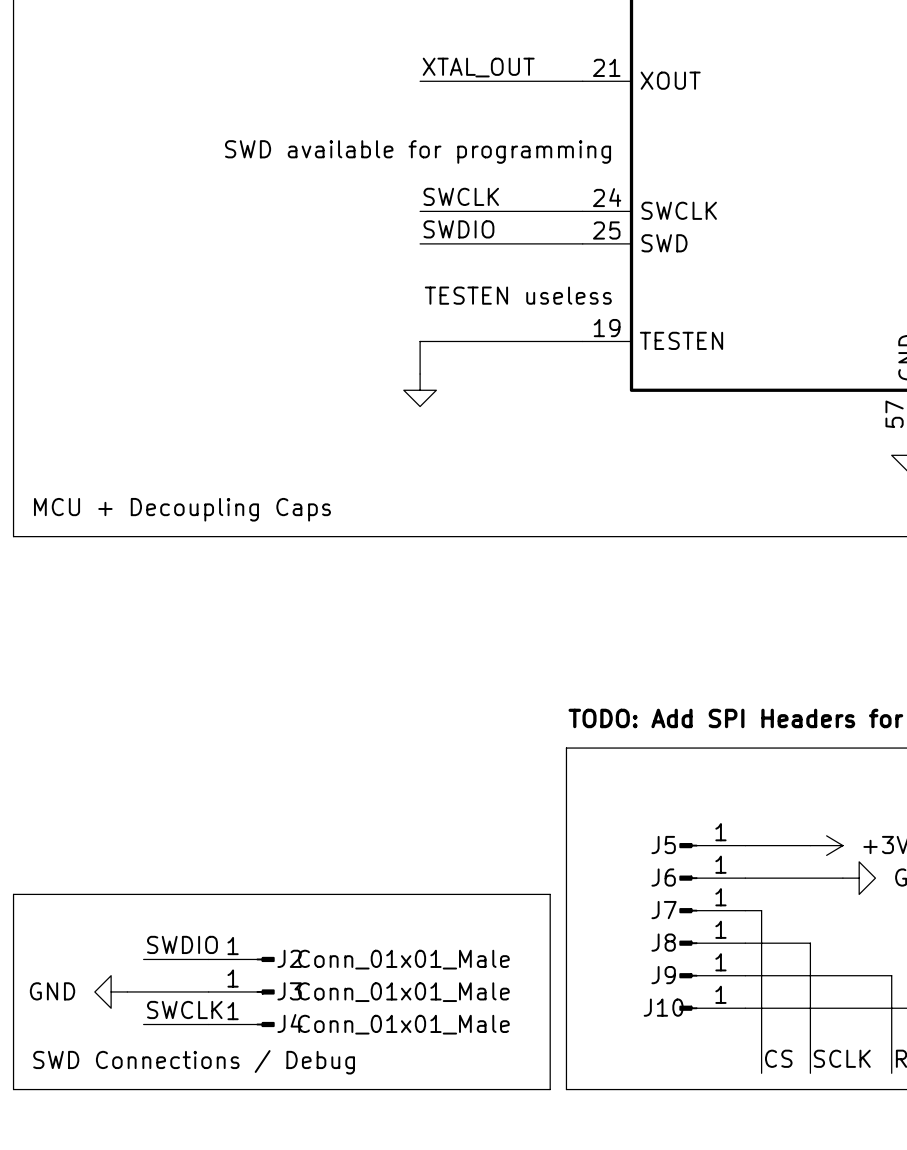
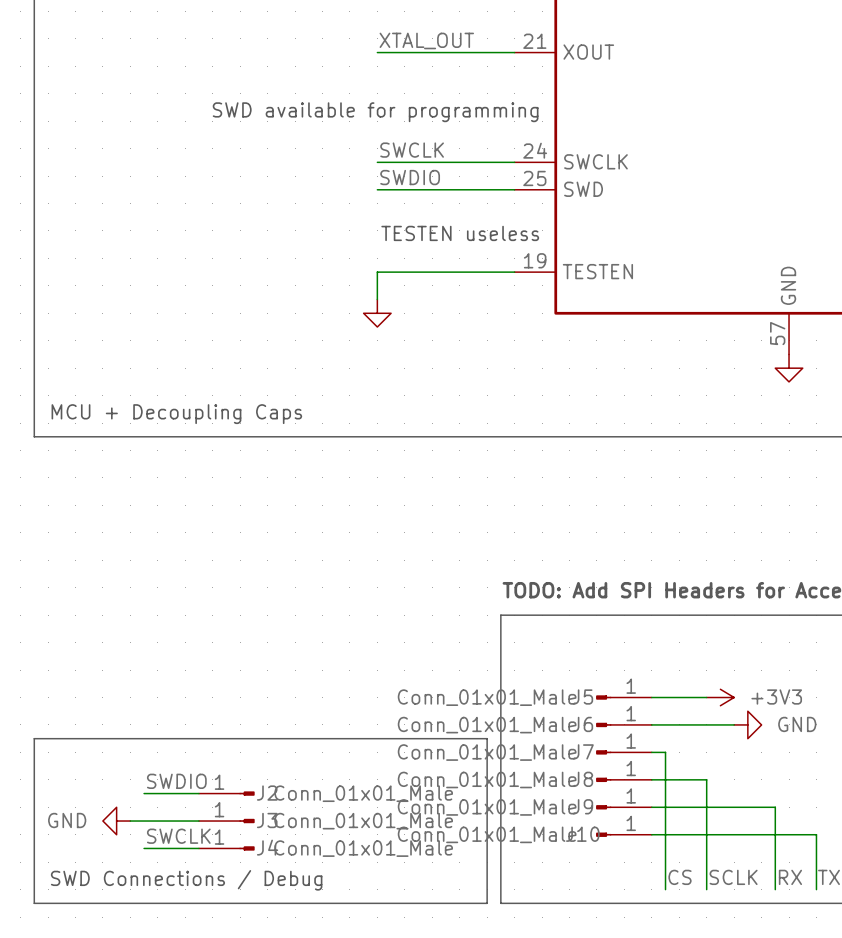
J5 value: none -> Conn_01x01_Male (487, 697)
J6 value: none -> Conn_01x01_Male (487, 725)
J7 value: none -> Conn_01x01_Male (487, 752)
J8 value: none -> Conn_01x01_Male (487, 779)
J9 value: none -> Conn_01x01_Male (487, 807)
J10 value: none -> Conn_01x01_Male (487, 834)

